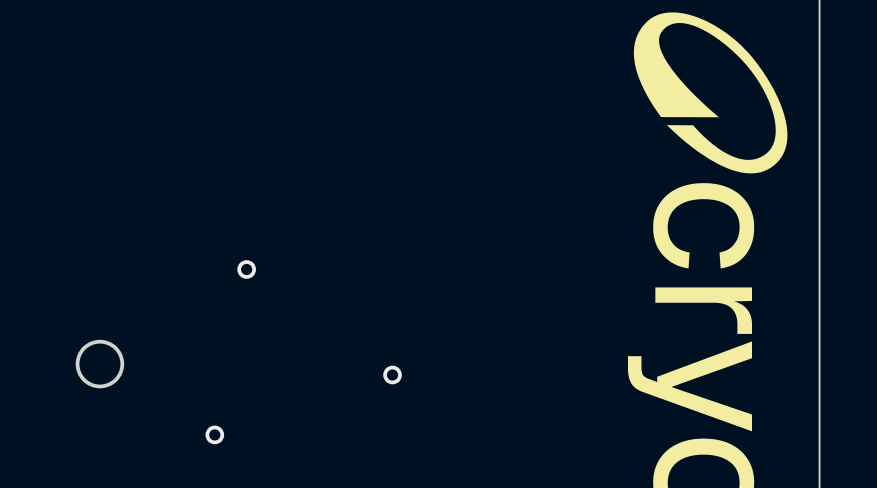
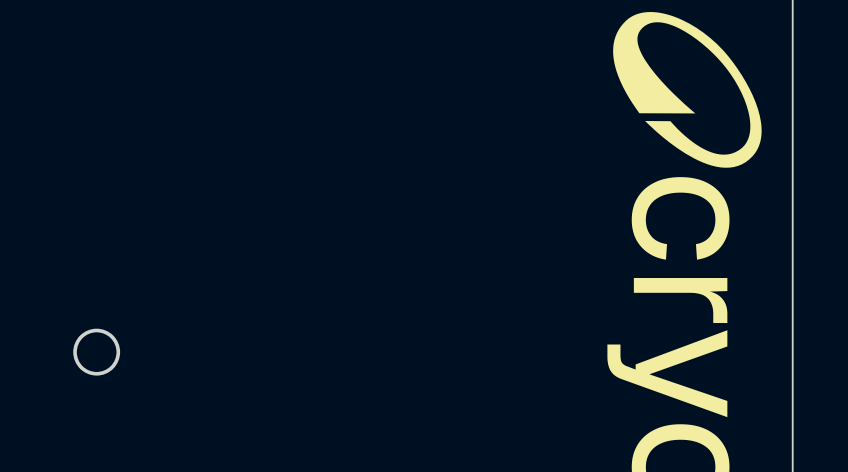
via: (246, 269) -> none
via: (392, 375) -> none
via: (214, 434) -> none

